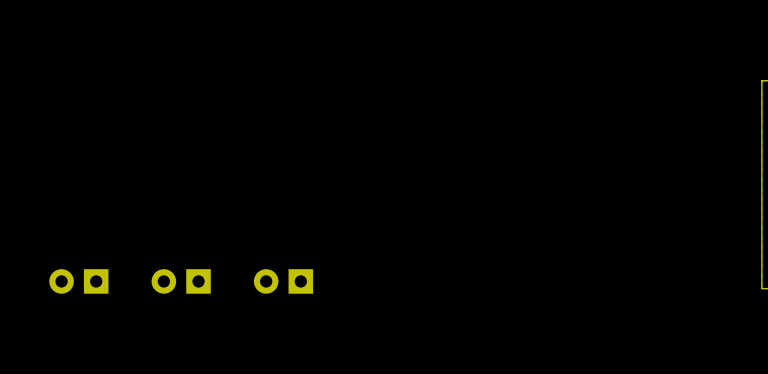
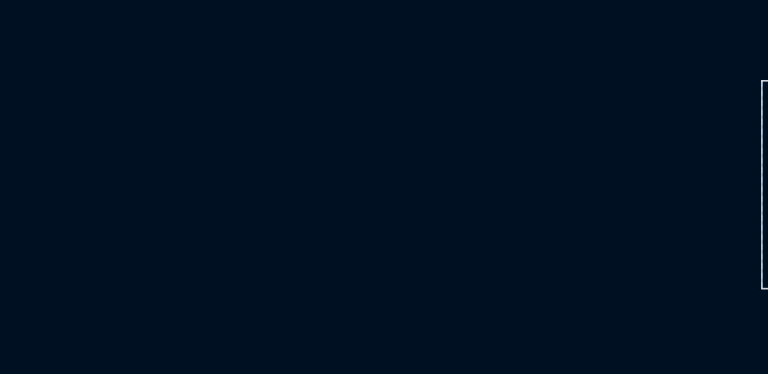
part: (78, 281) -> none
part: (181, 281) -> none
part: (283, 281) -> none

